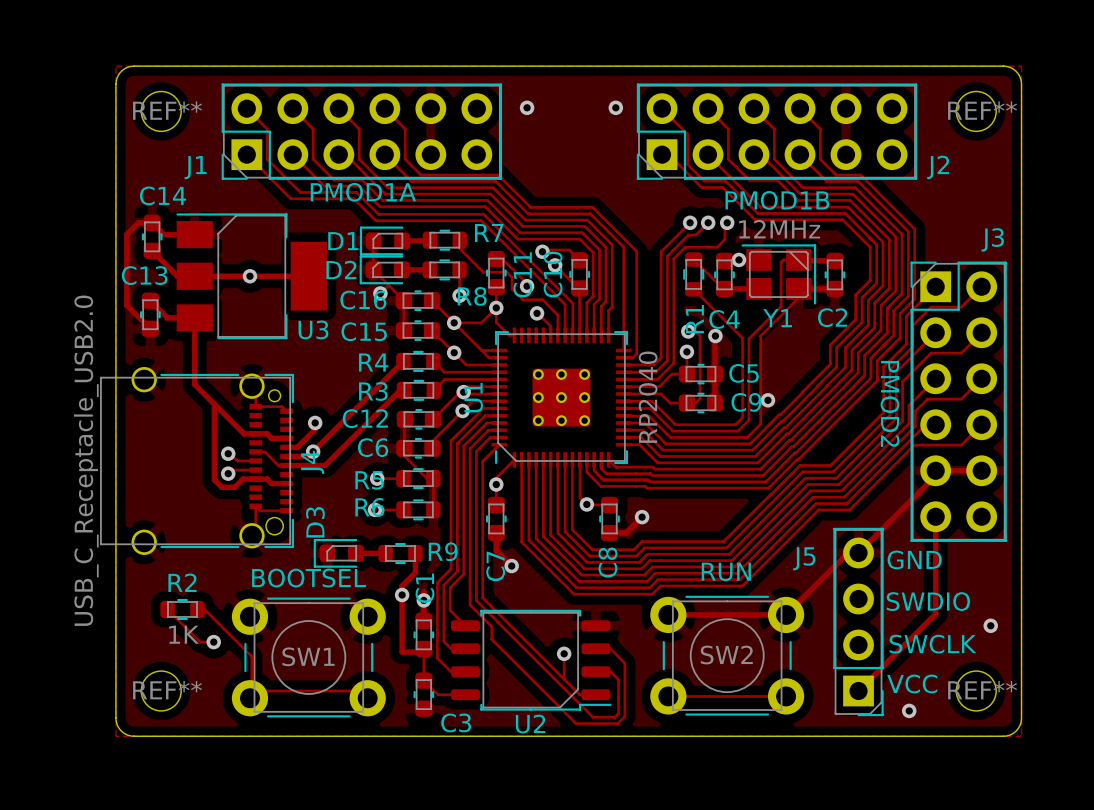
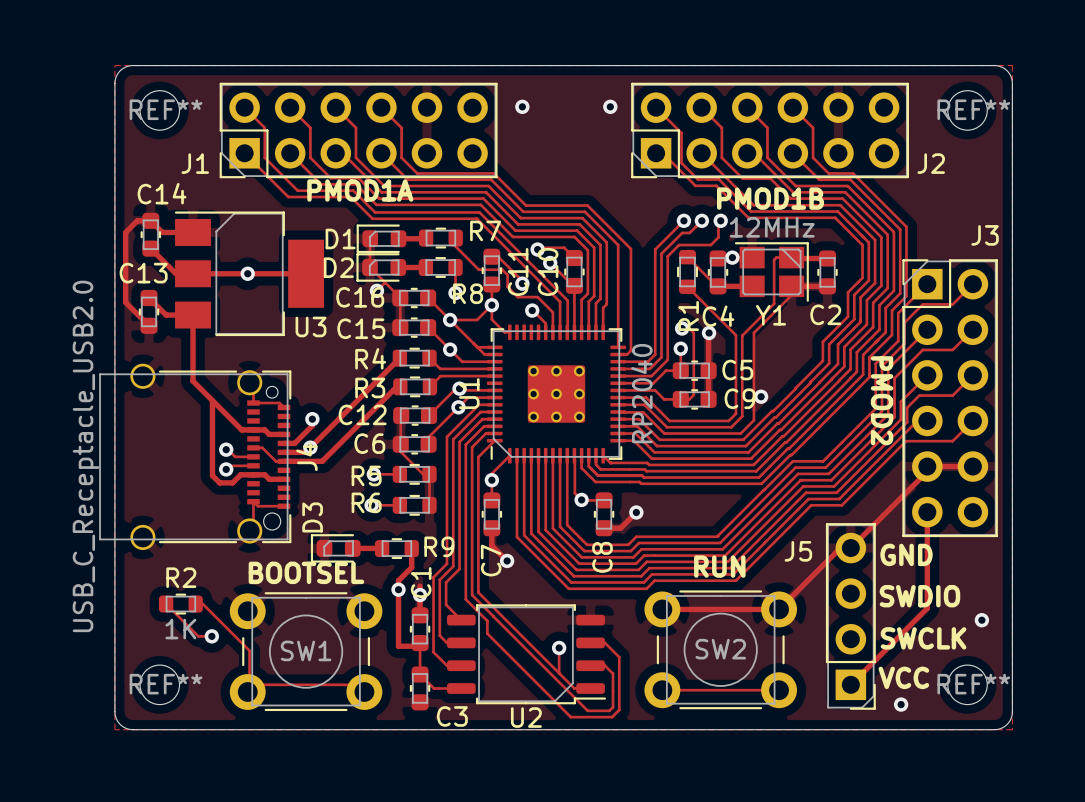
track: (499, 386) (469, 386) (463, 392) -> none

